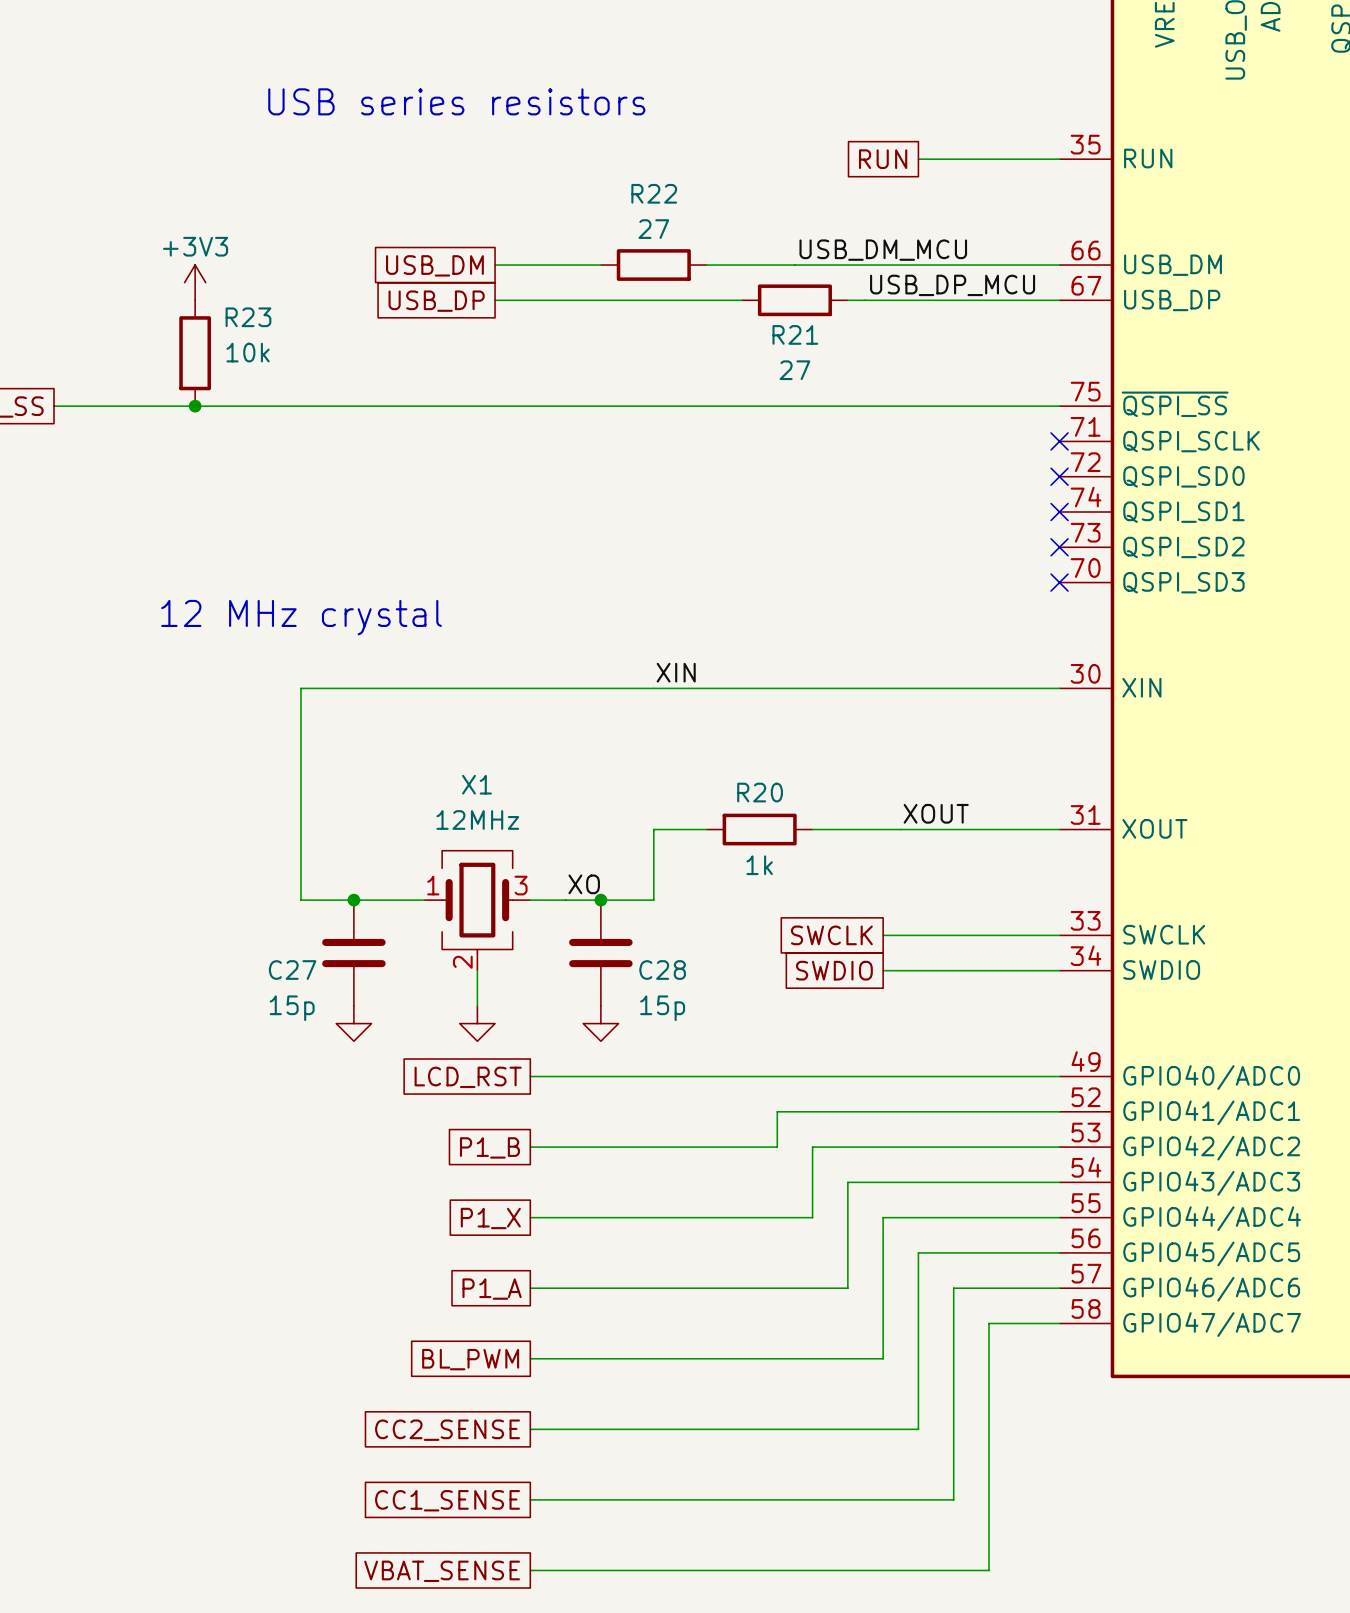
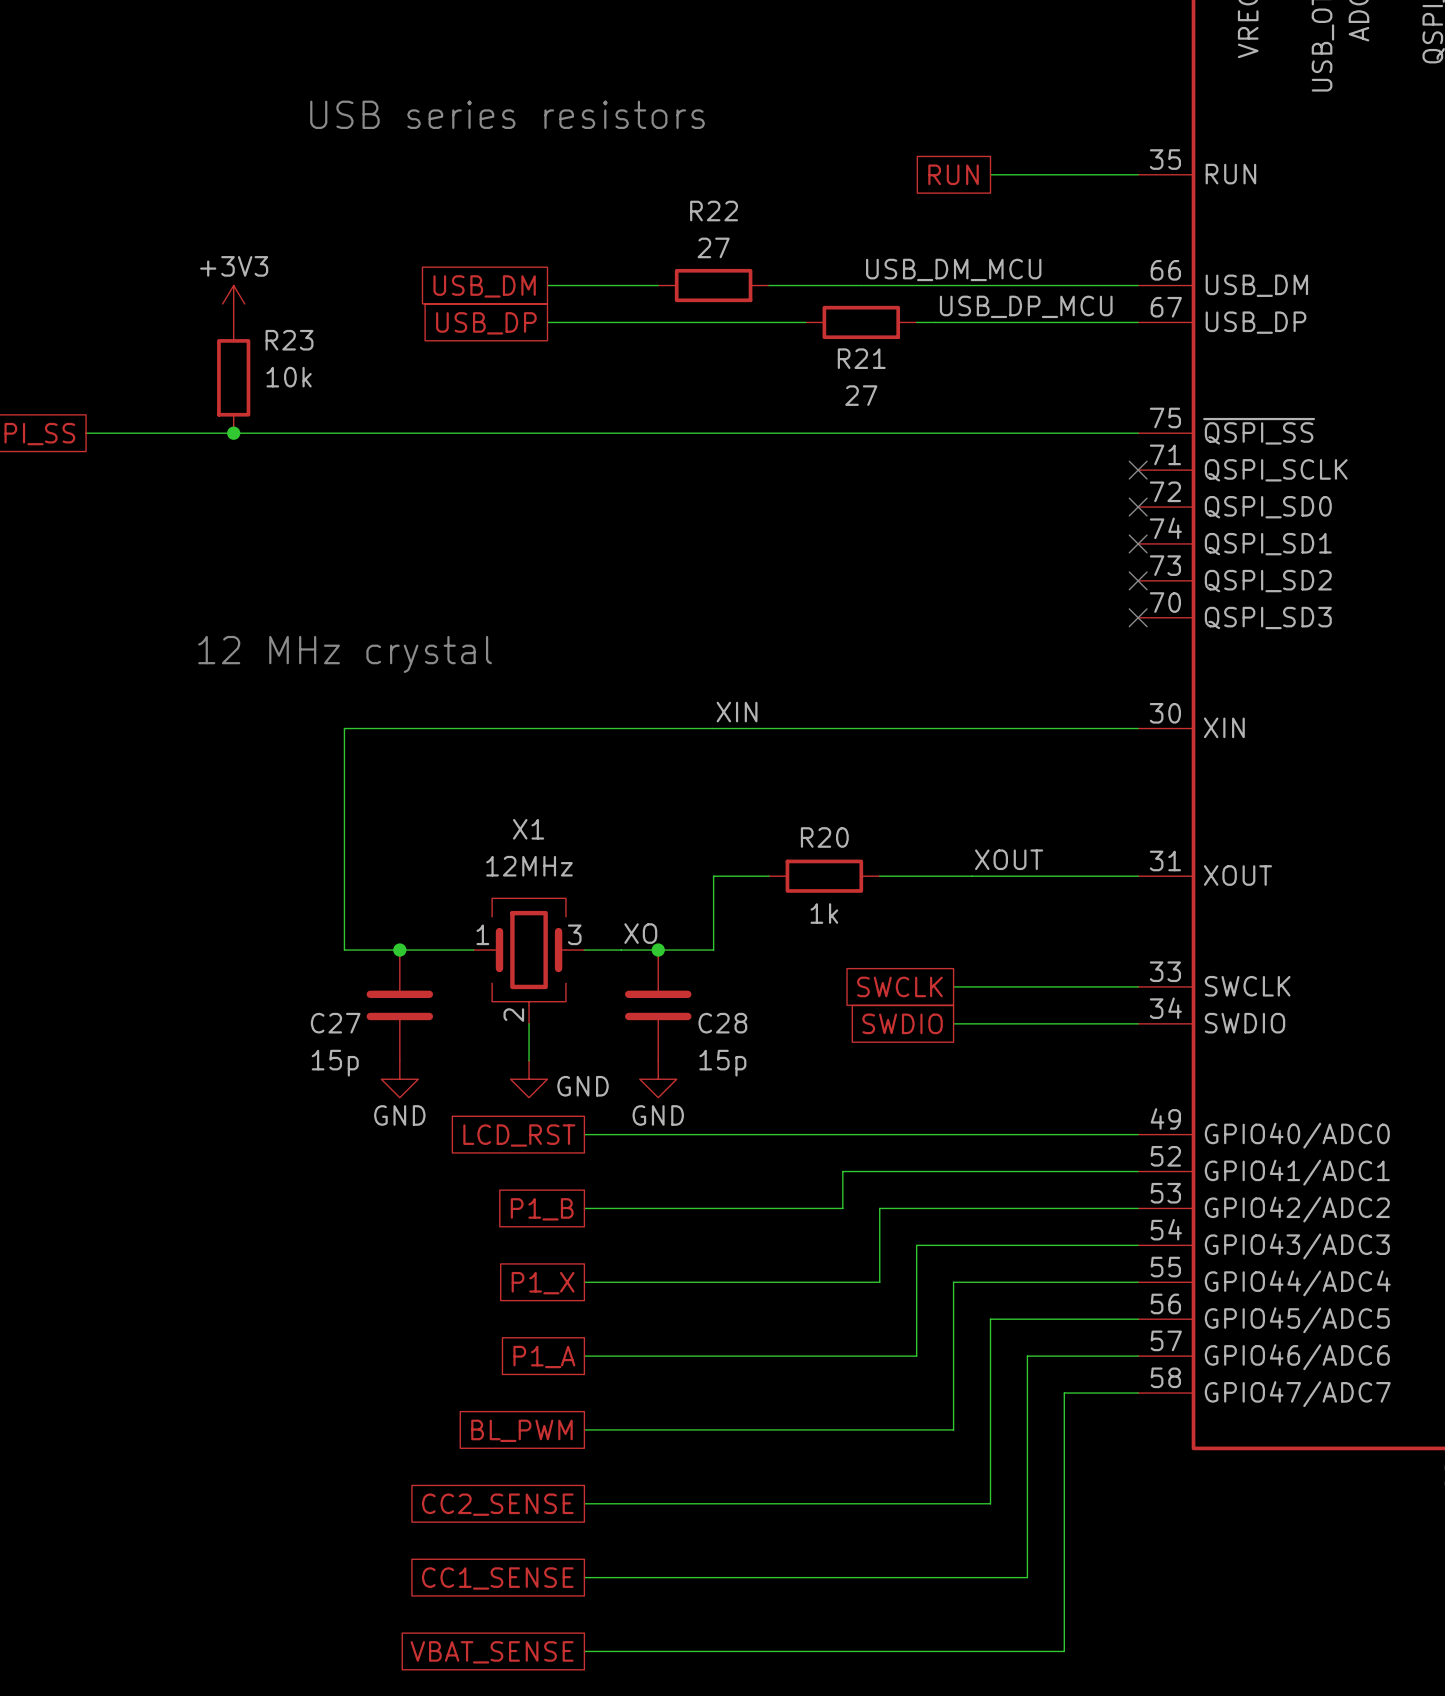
power symbol text: none -> GND (583, 1086)
power symbol text: none -> GND (399, 1115)
power symbol text: none -> GND (658, 1115)

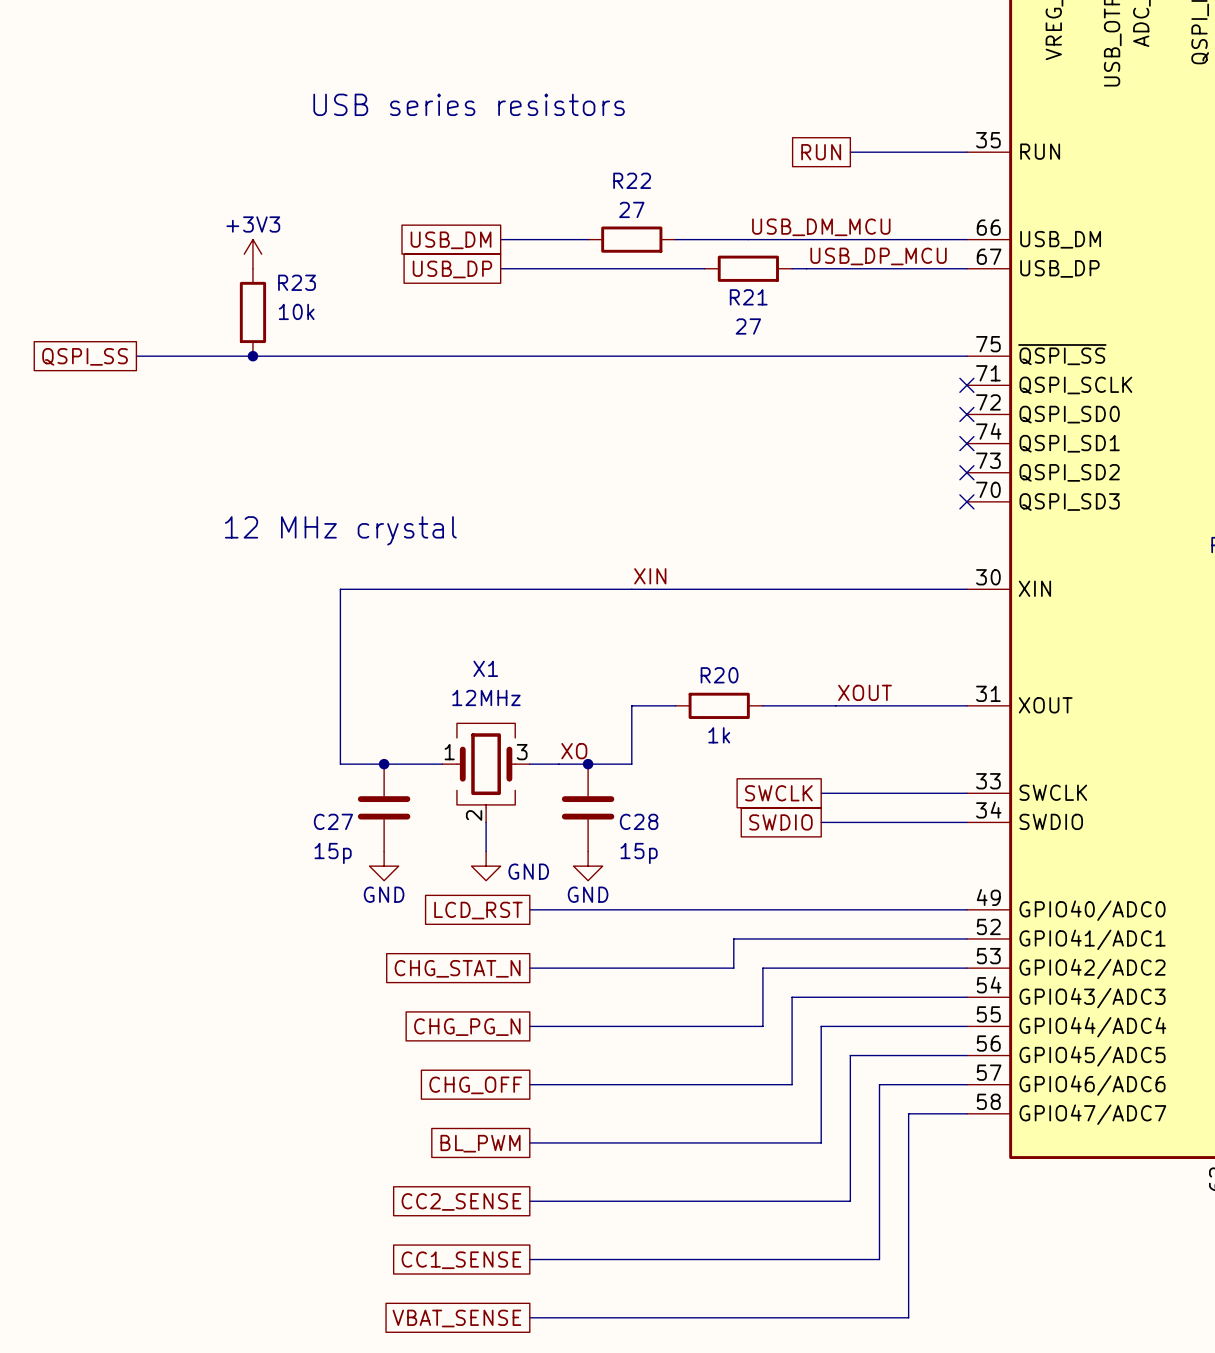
global label: P1_B (542, 1209) -> CHG_STAT_N (457, 968)
global label: P1_X (543, 1283) -> CHG_PG_N (467, 1027)
global label: P1_A (544, 1356) -> CHG_OFF (475, 1085)

